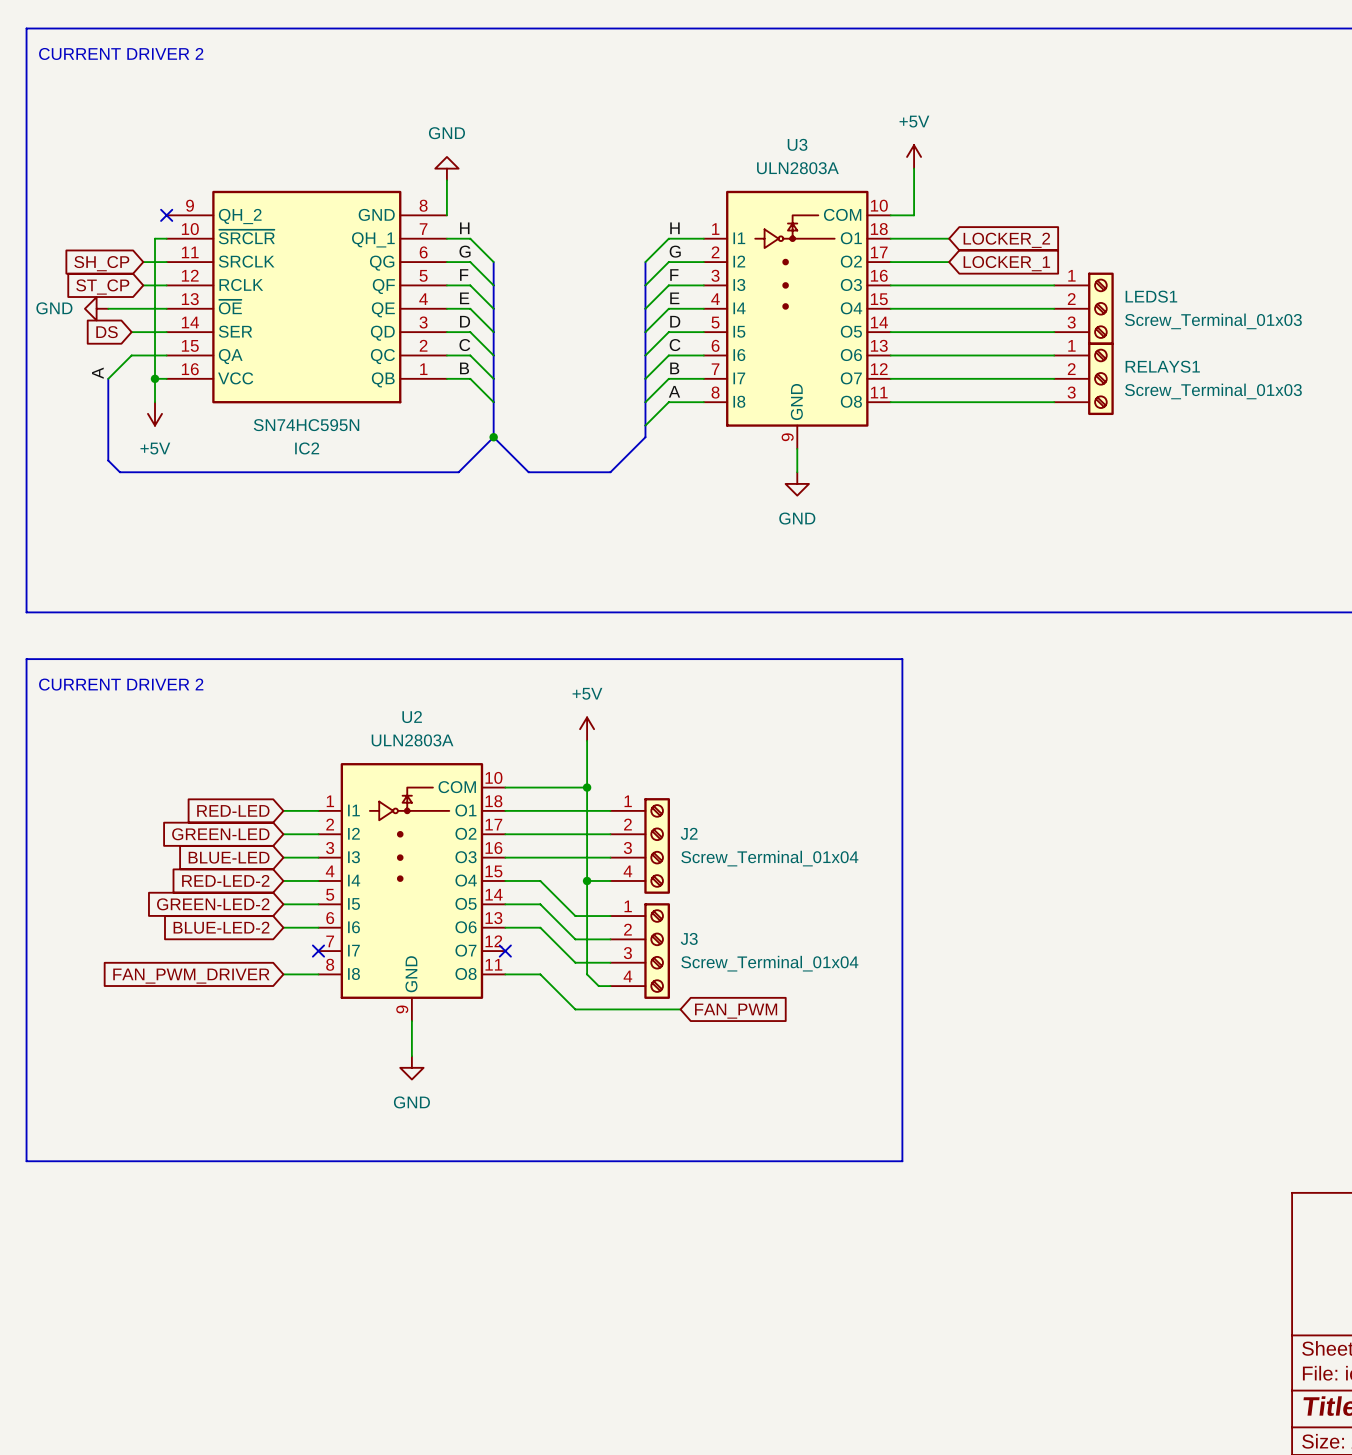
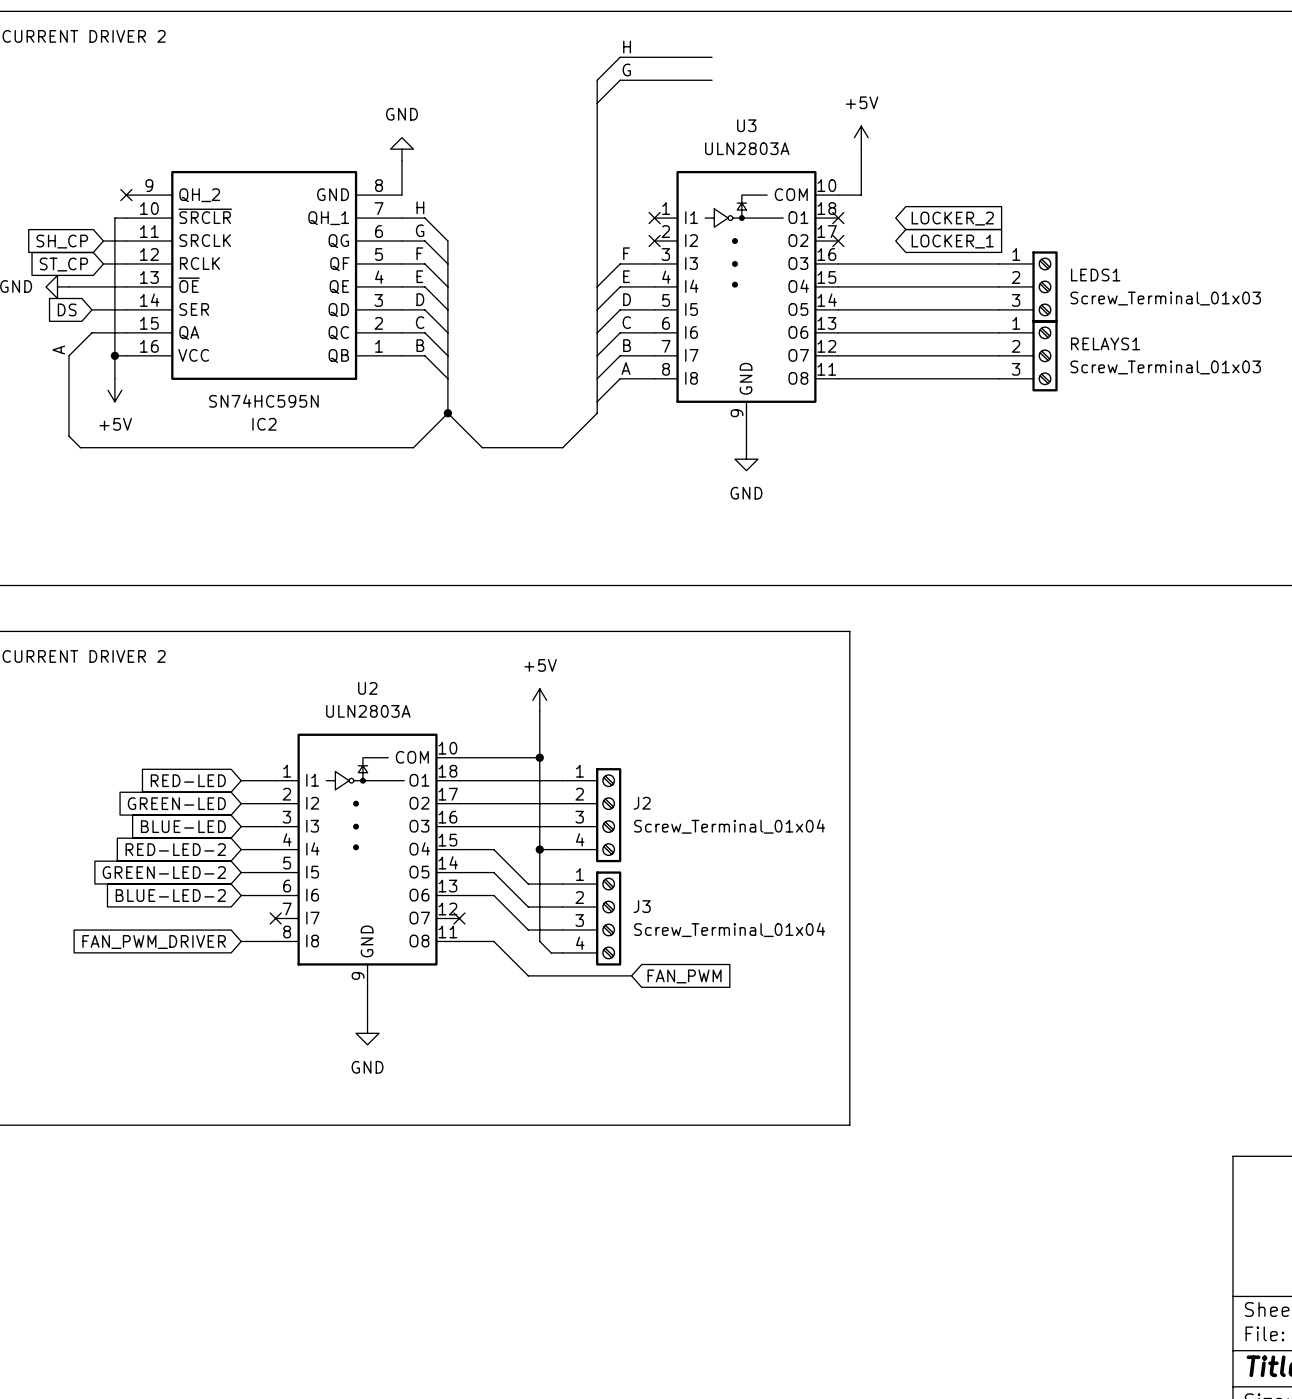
wire: none -> (712, 57) (620, 57) (597, 80)
bus: none -> (597, 80) (597, 241)
wire: none -> (712, 80) (620, 80) (597, 103)
label position: H (674, 228) -> H (627, 47)
wire: (703, 238) (668, 238) (645, 262) -> none
no-connect mark: none -> (654, 218)
wire: (890, 238) (949, 238) -> none
no-connect mark: none -> (838, 218)
label position: G (675, 251) -> G (626, 70)
wire: (703, 262) (668, 262) (645, 285) -> none
no-connect mark: none -> (654, 241)
wire: (890, 262) (949, 262) -> none
no-connect mark: none -> (838, 241)

